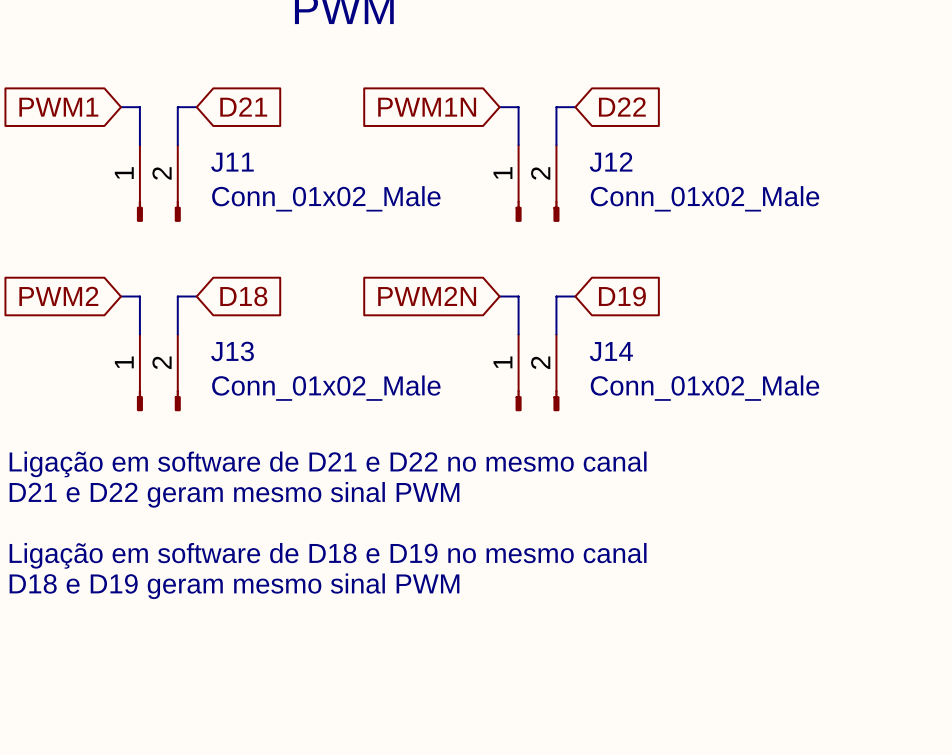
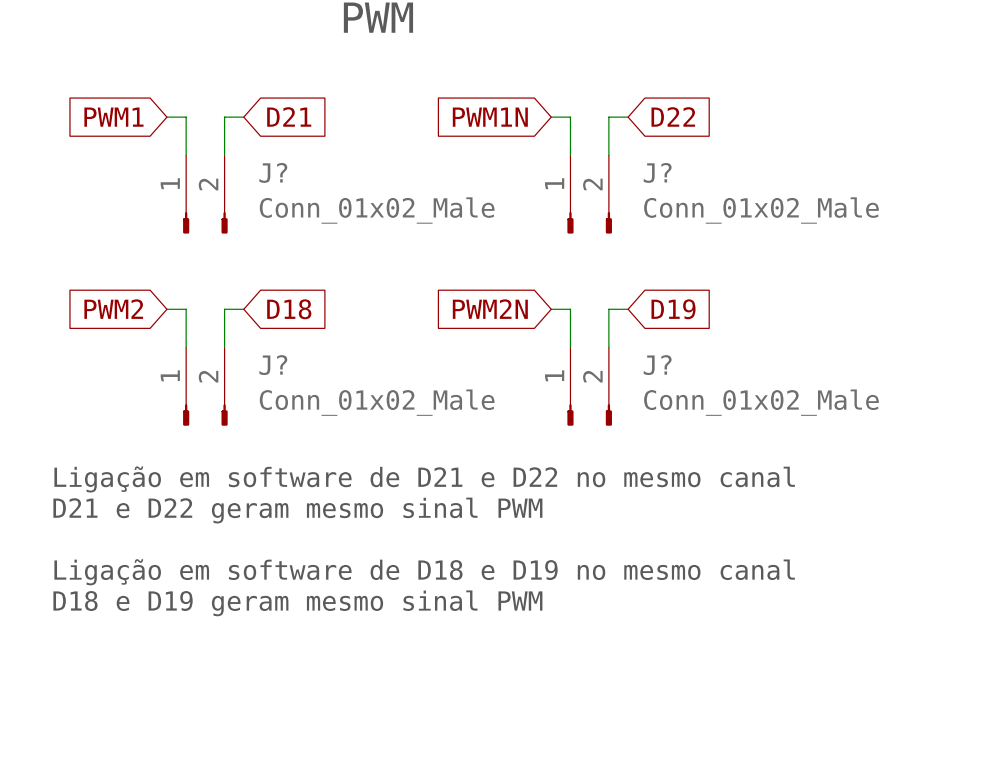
J11 name: J11 (232, 162) -> J? (273, 172)
J12 name: J12 (611, 162) -> J? (657, 172)
J13 name: J13 (232, 351) -> J? (273, 365)
J14 name: J14 (611, 351) -> J? (657, 365)

